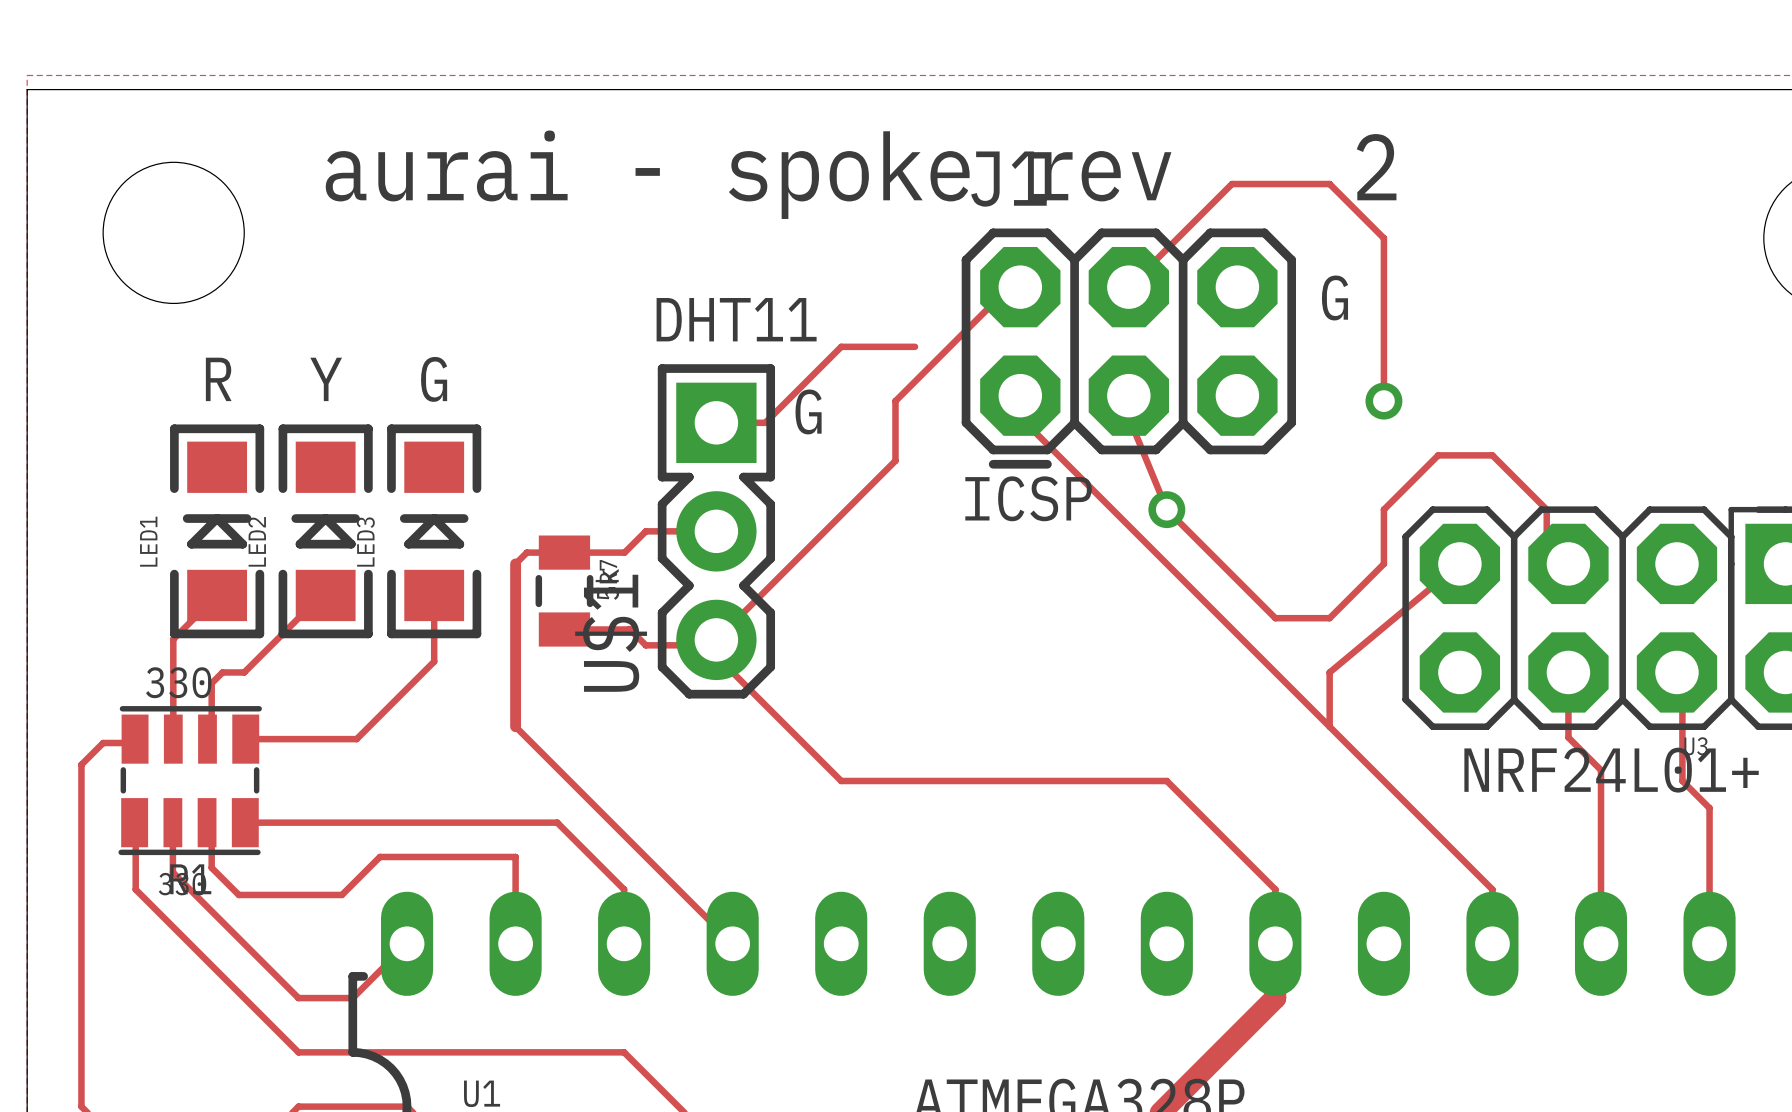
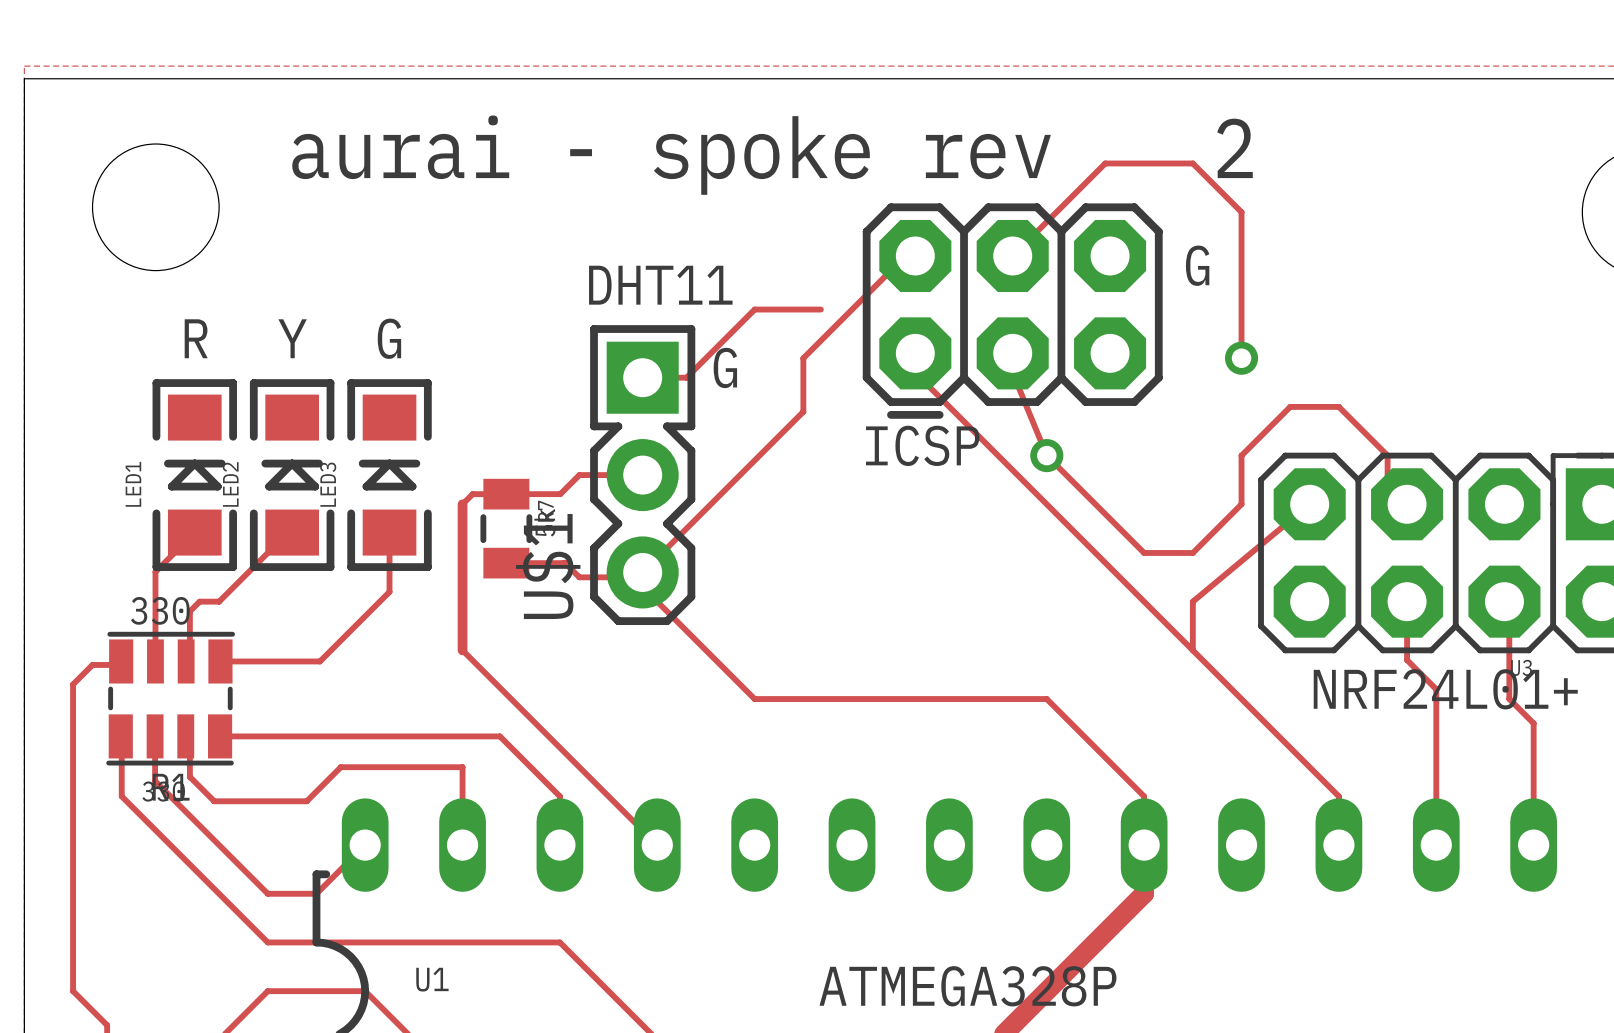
J1 name: J1 (1008, 179) -> none

